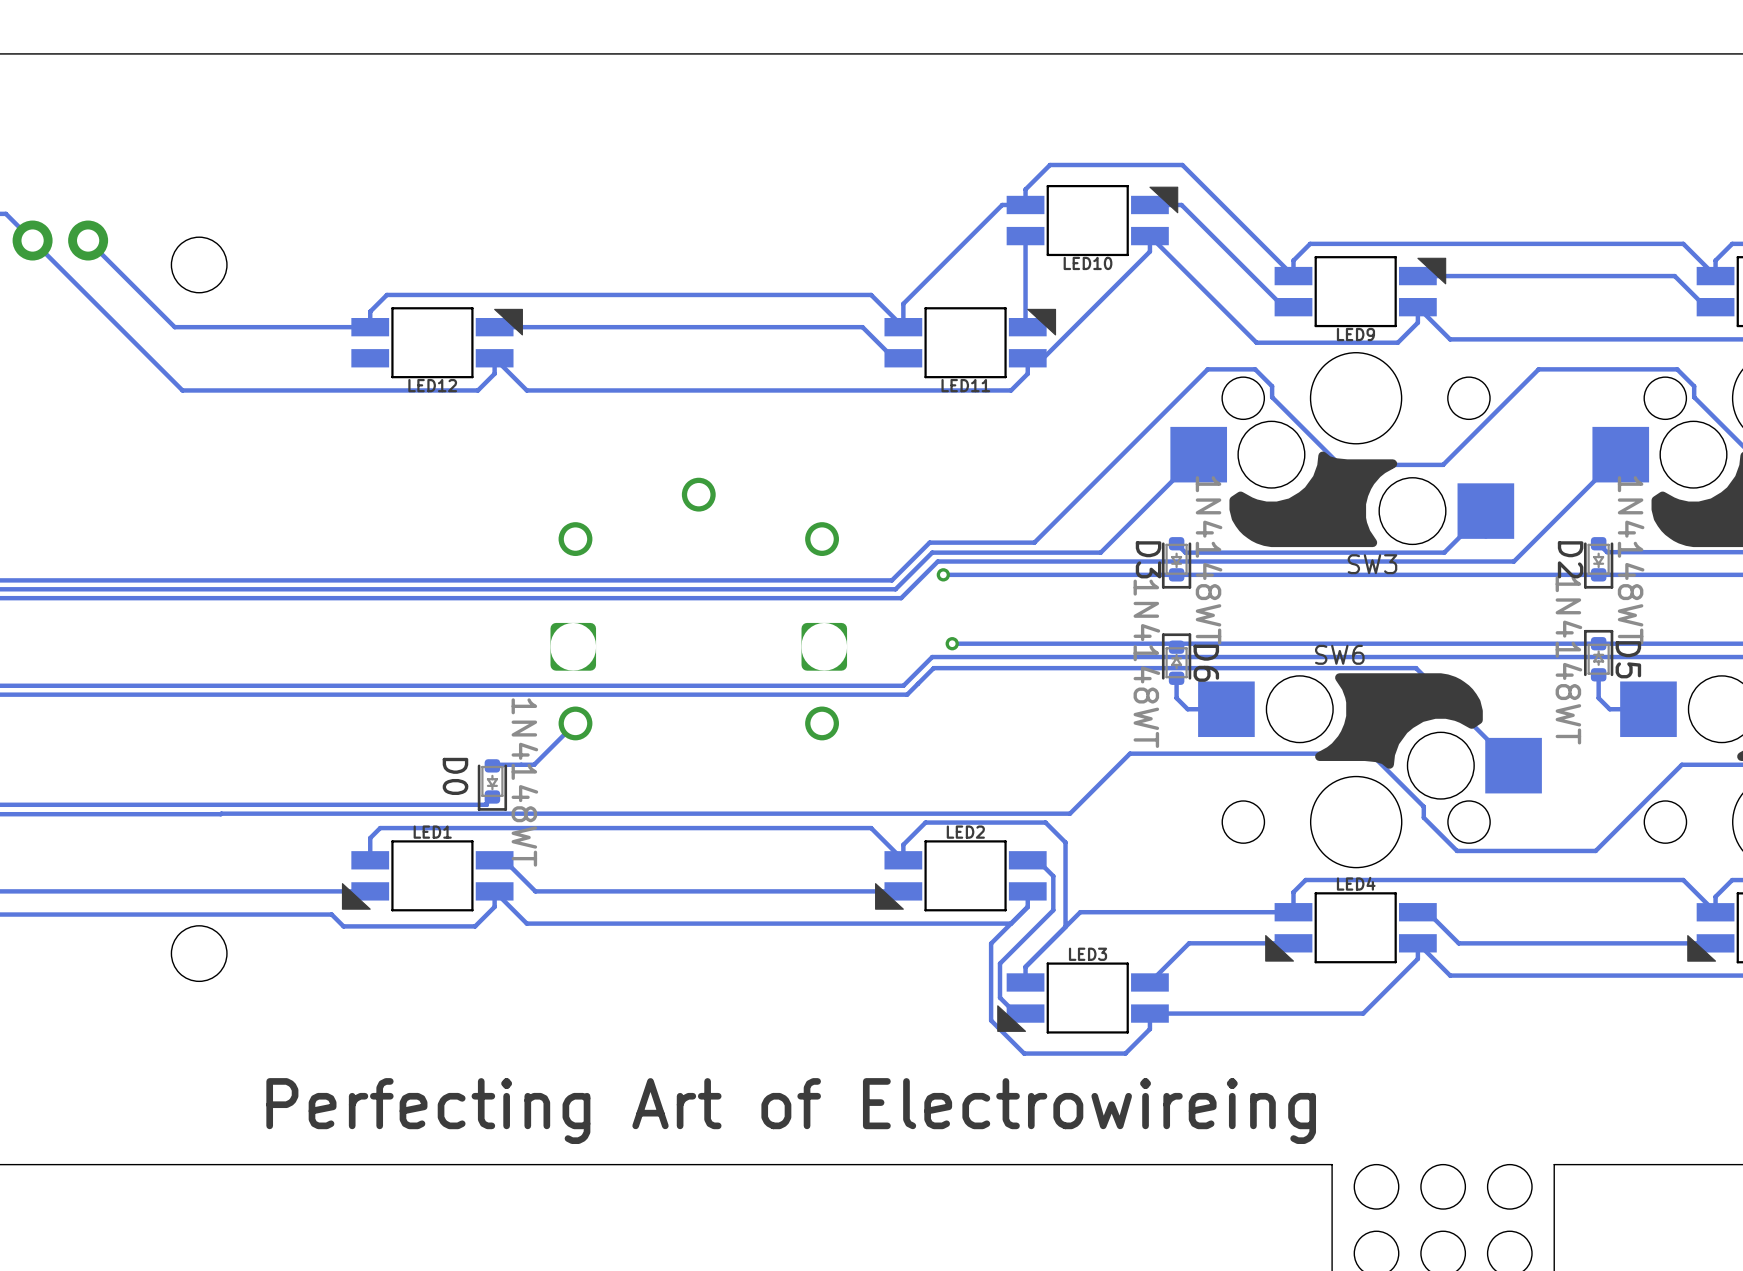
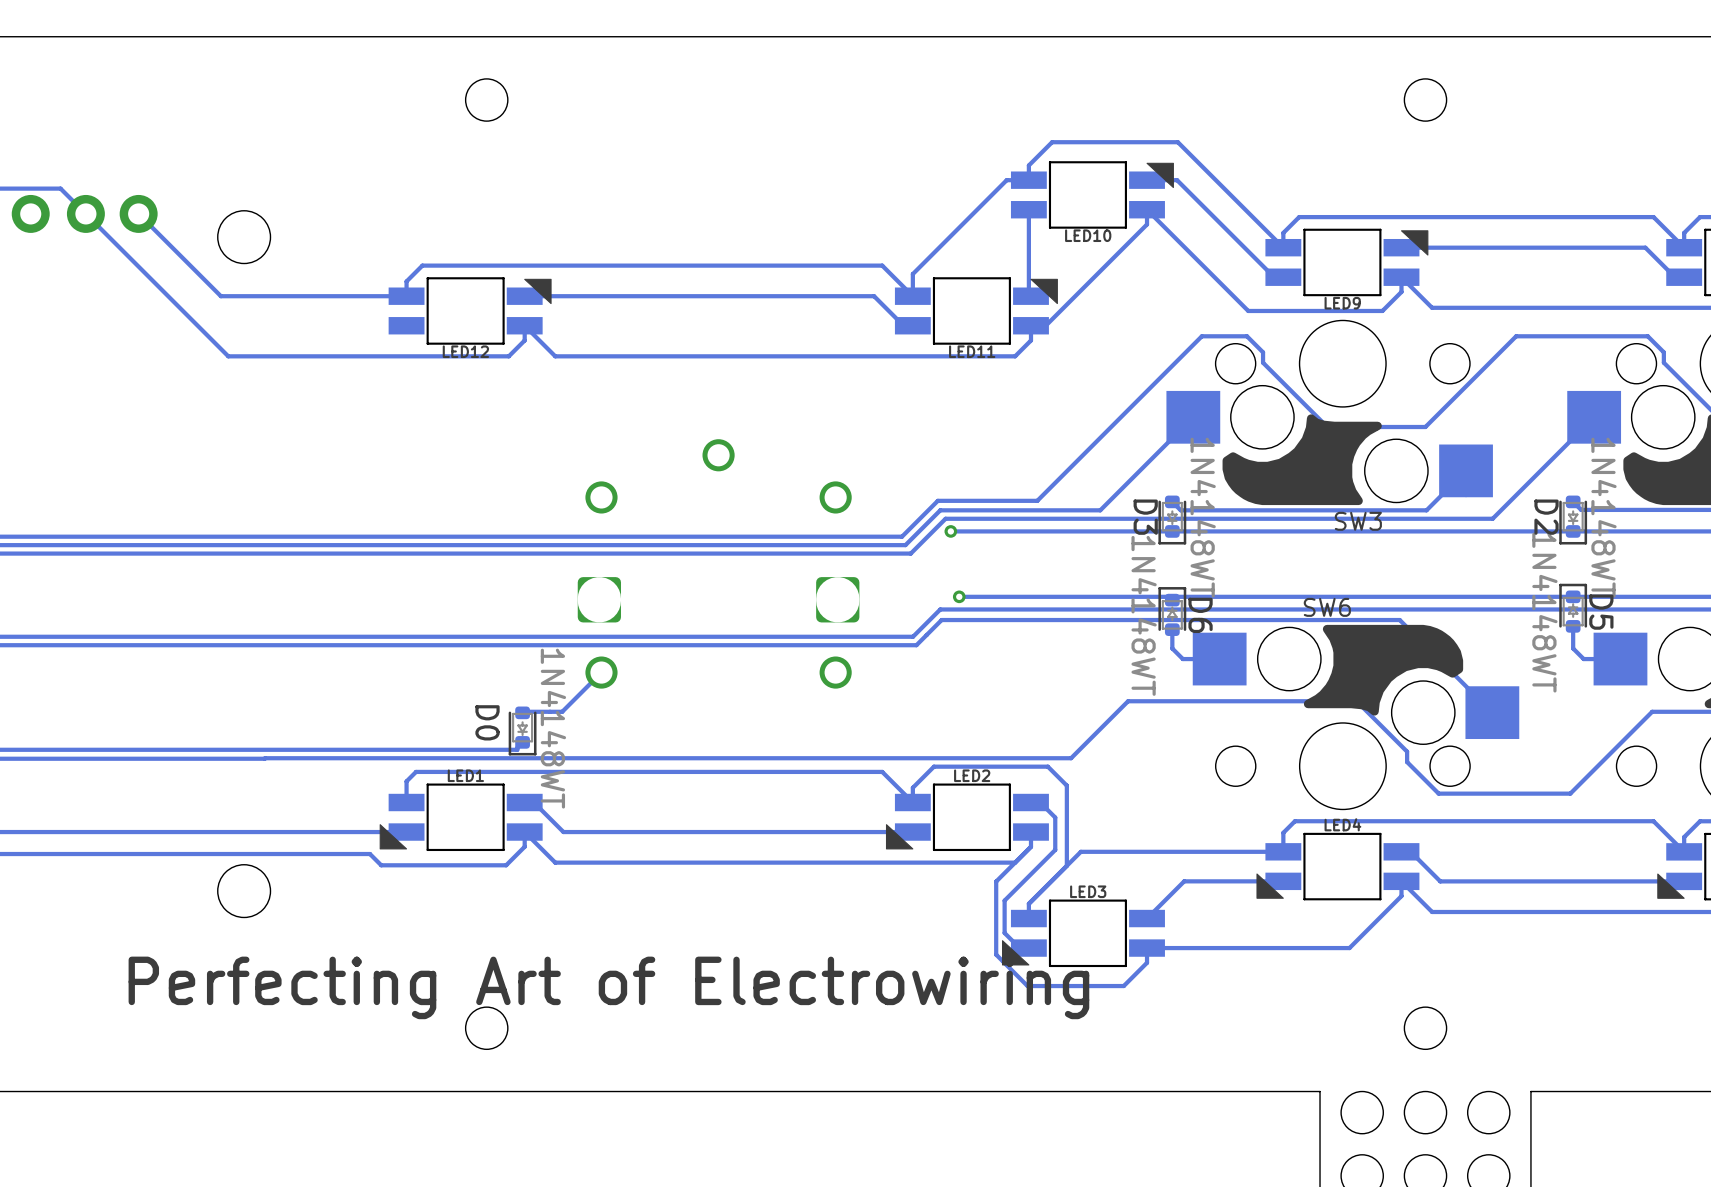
round board edge: none -> [465, 78, 509, 122]
round board edge: none -> [1403, 78, 1448, 122]
round board edge: none -> [465, 1006, 509, 1050]
round board edge: none -> [1403, 1006, 1448, 1050]
text: Perfecting Art of Electrowireing (791, 1111) -> Perfecting Art of Electrowiring (608, 987)

